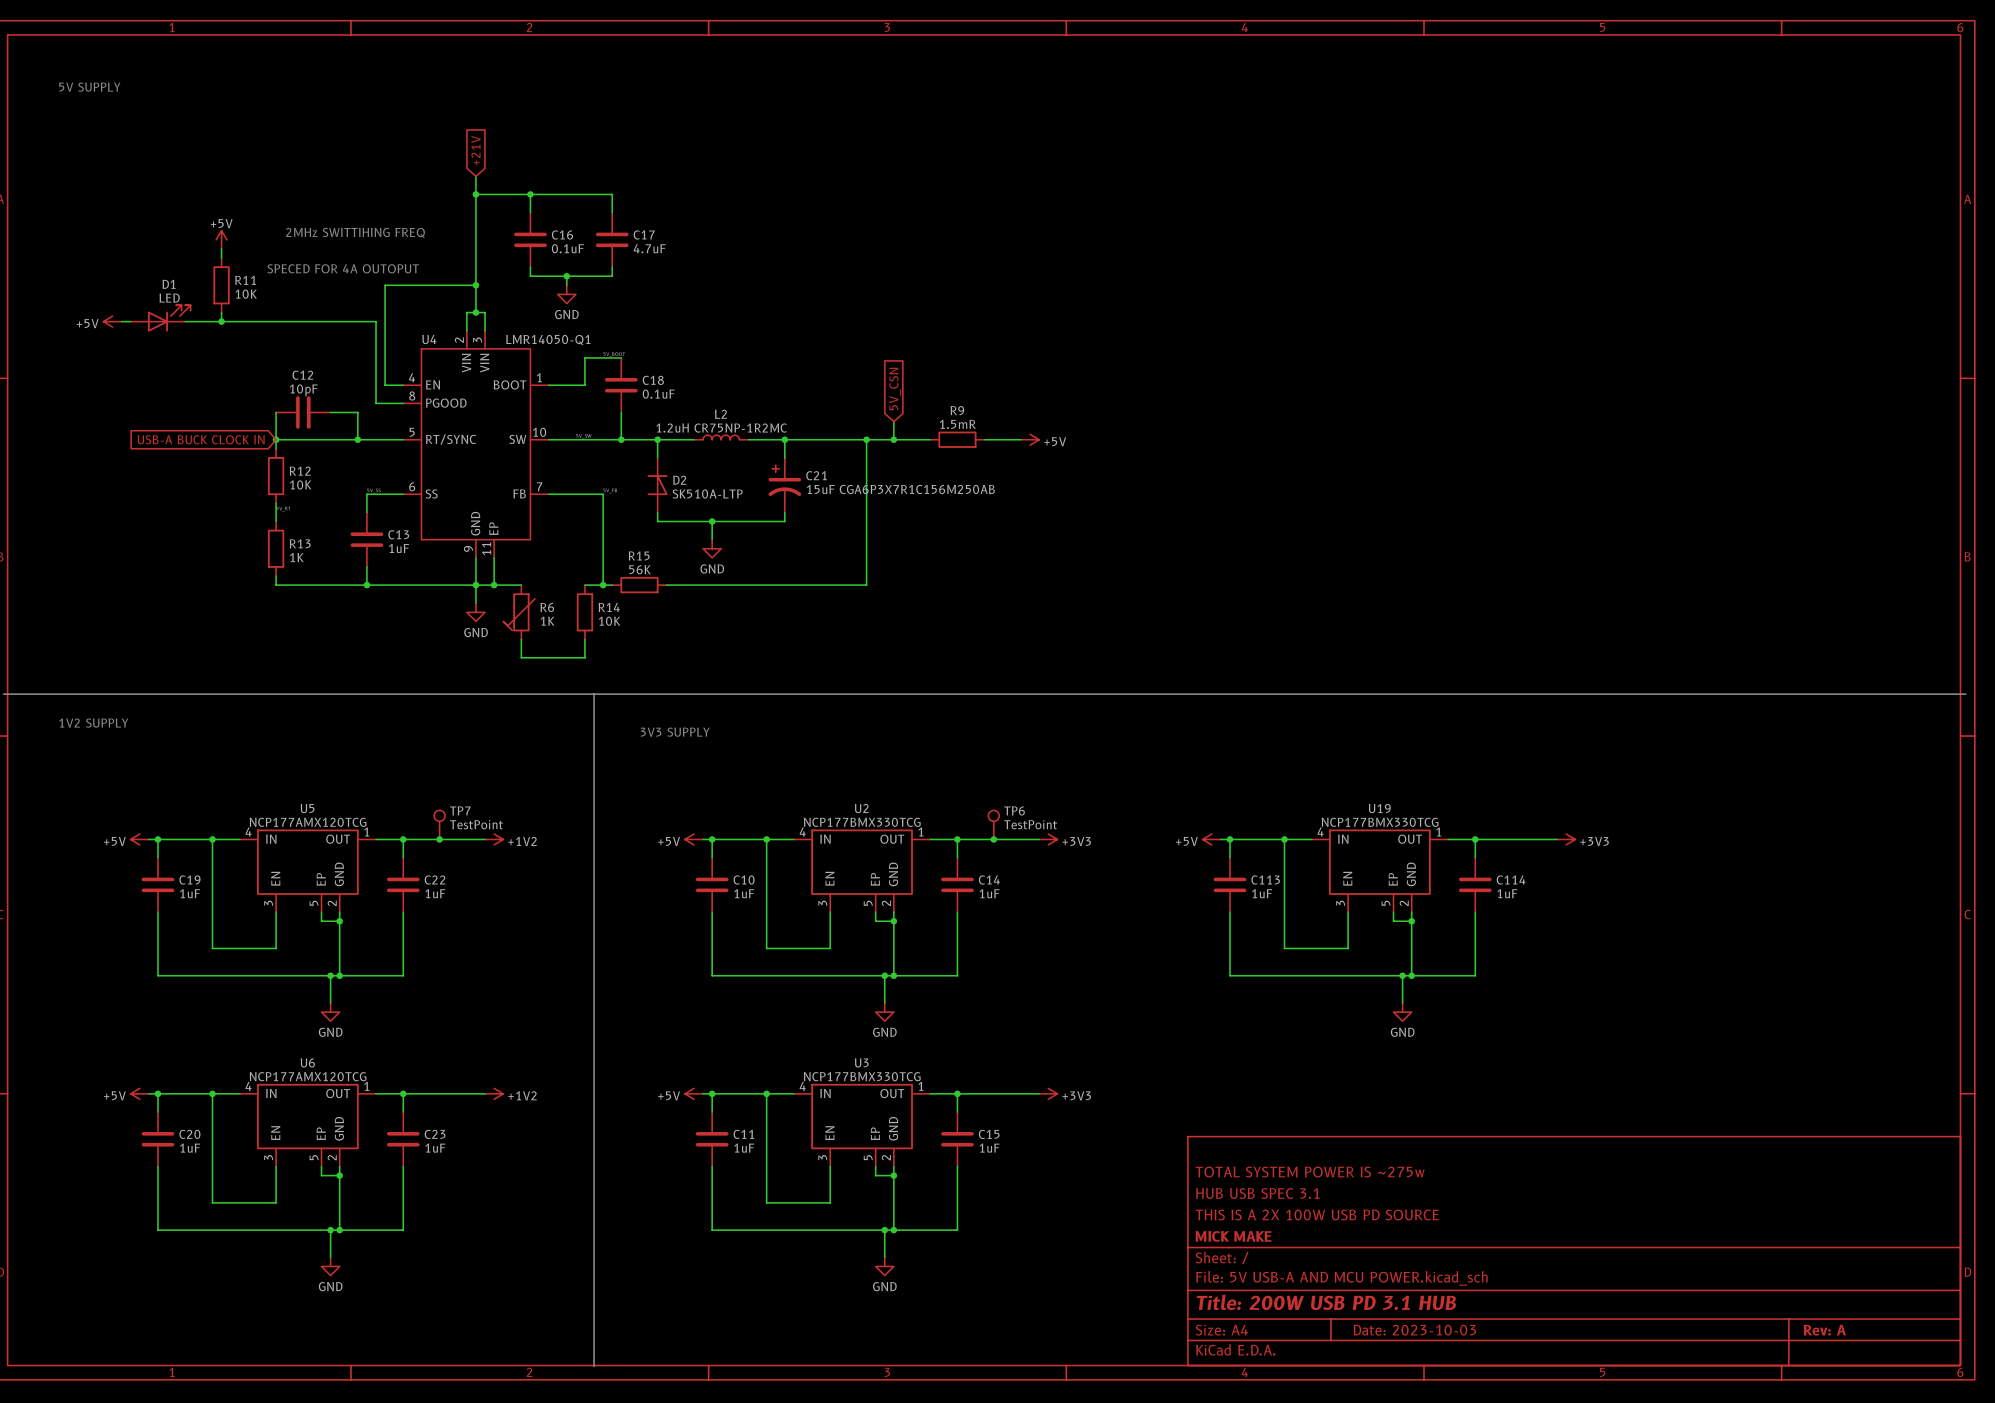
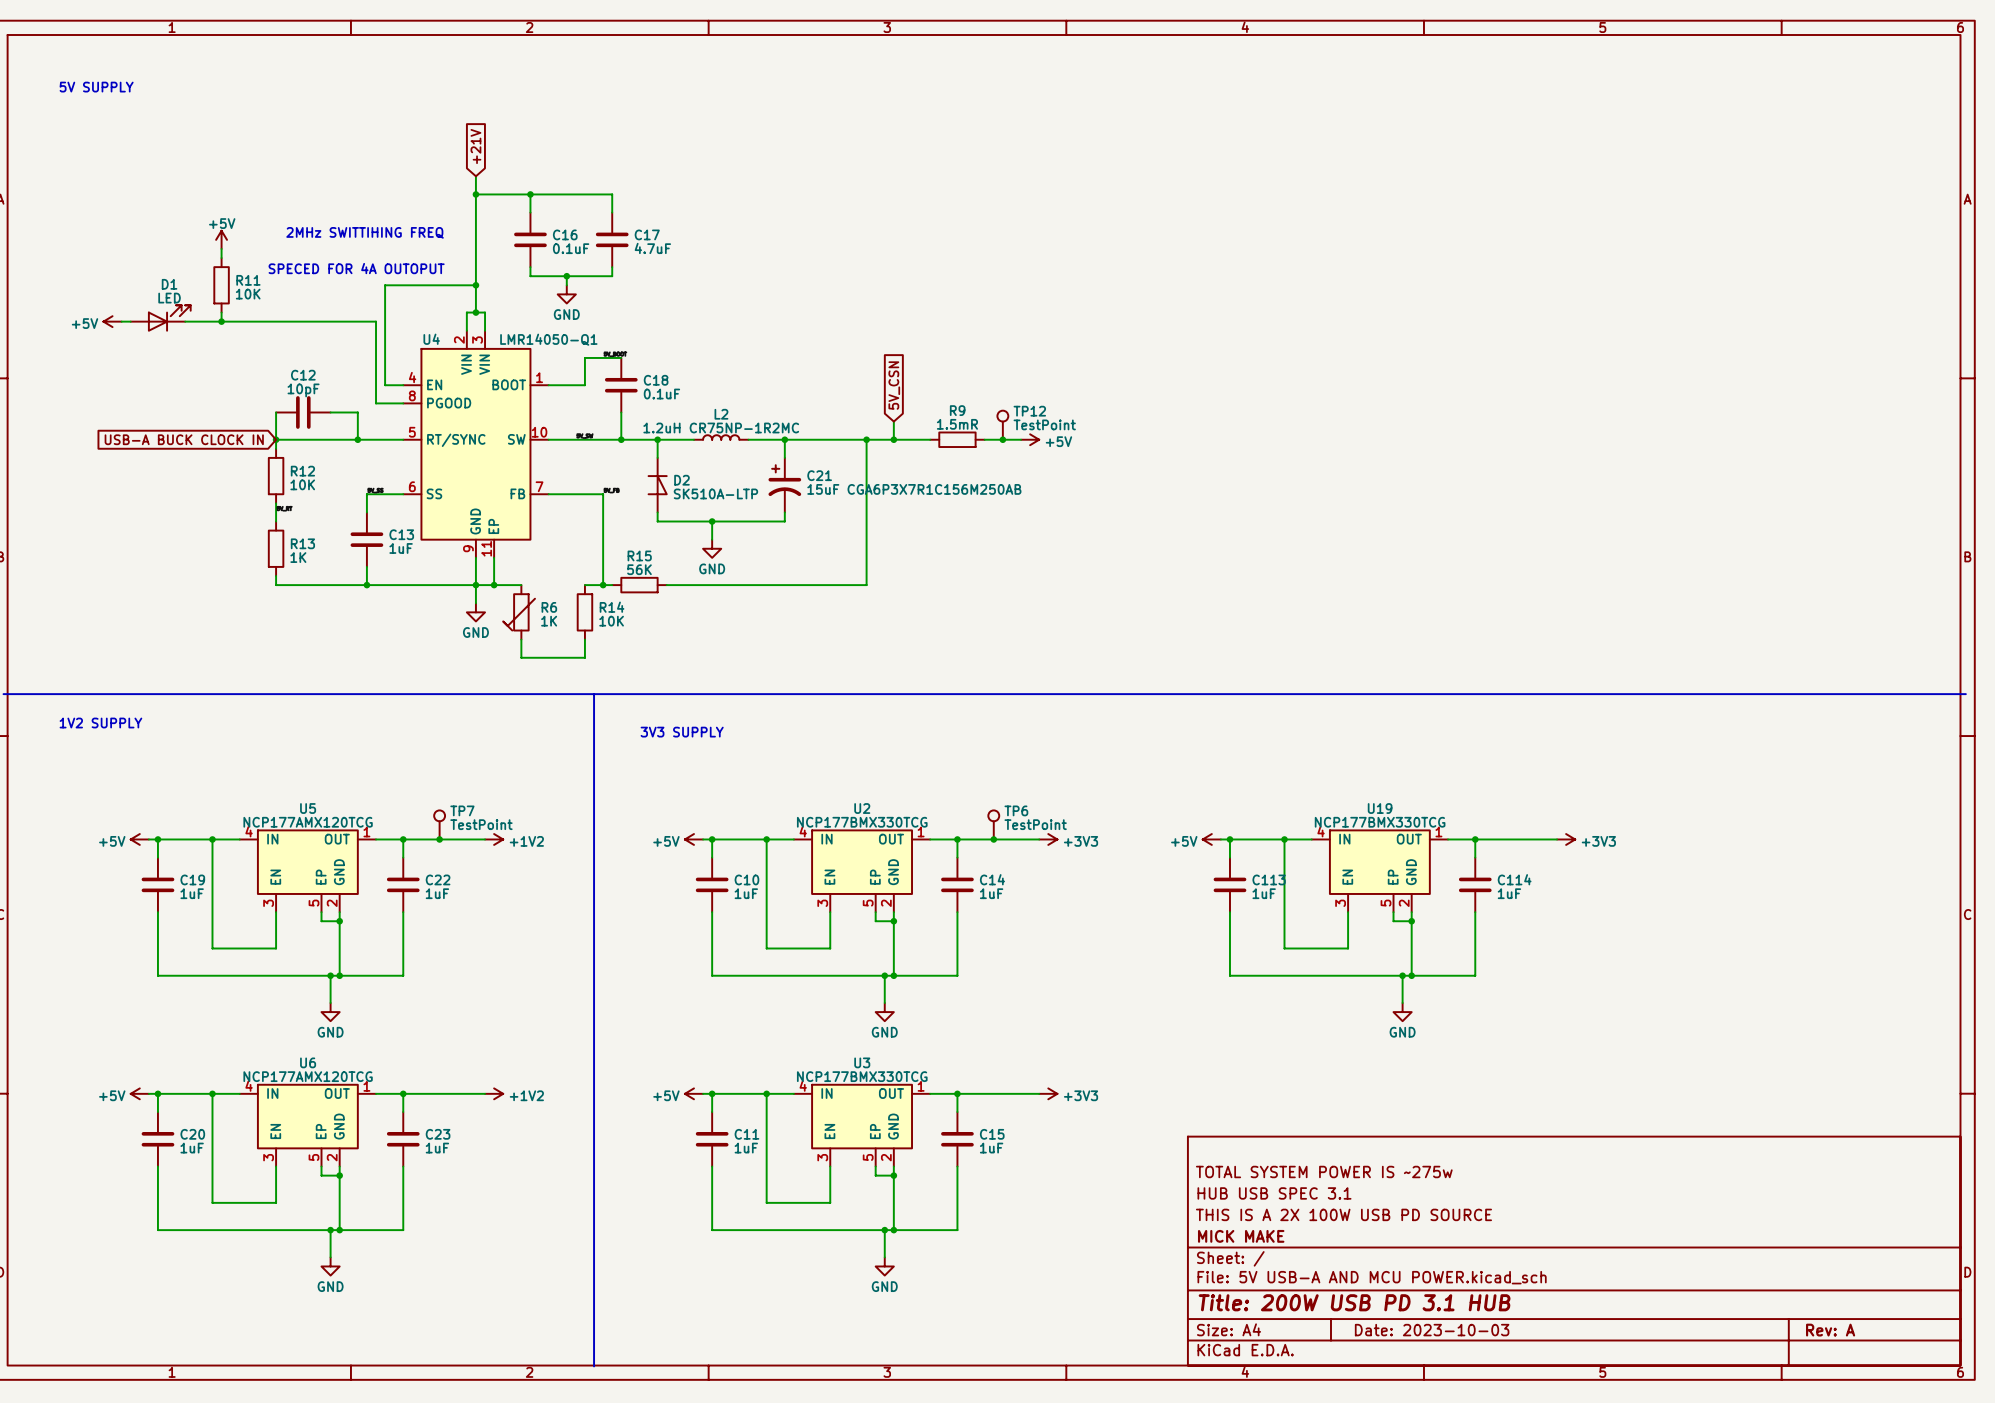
TP12: none -> TestPoint (1002, 425)
junction: none -> (1002, 439)

